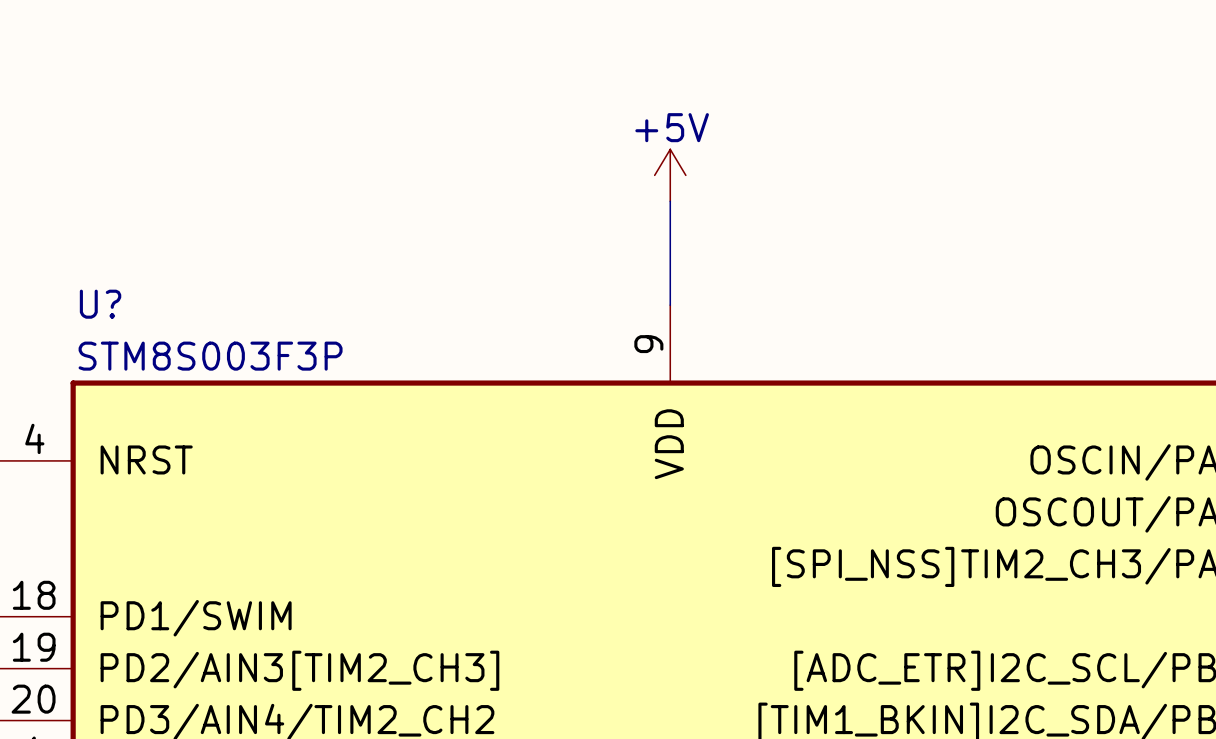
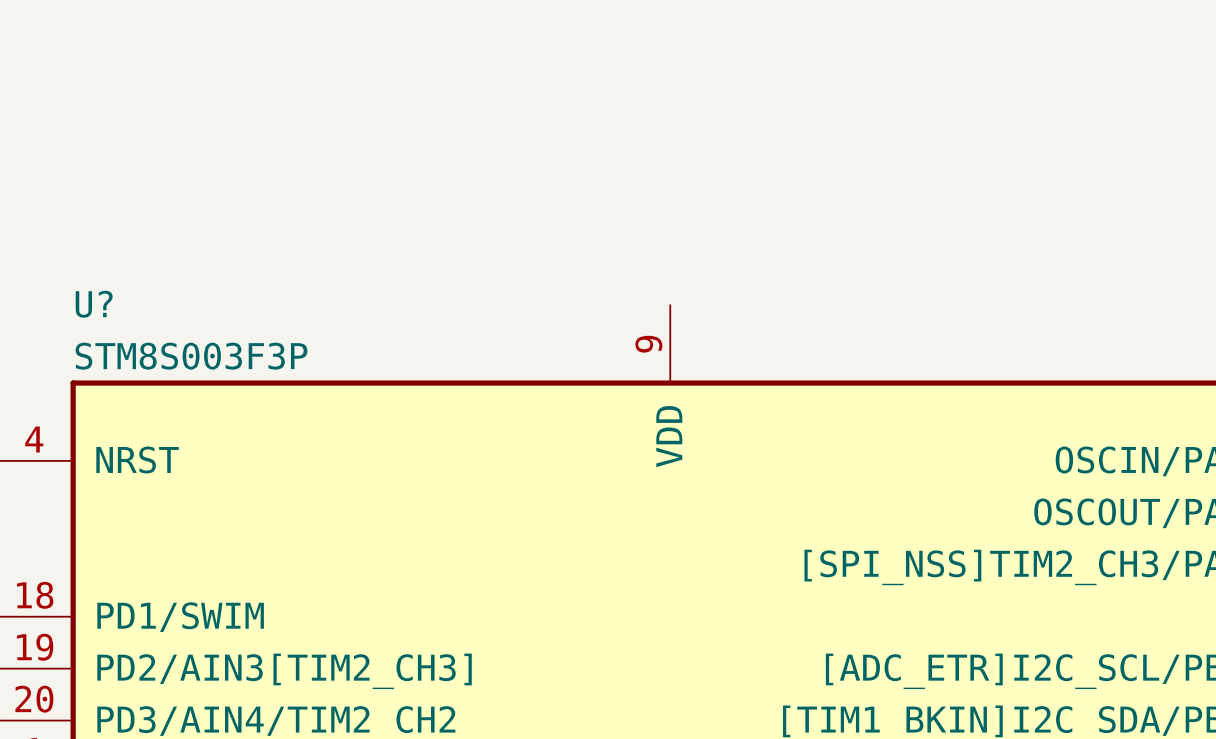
power symbol: +5V (670, 175) -> none
wire: (670, 201) (670, 305) -> none

